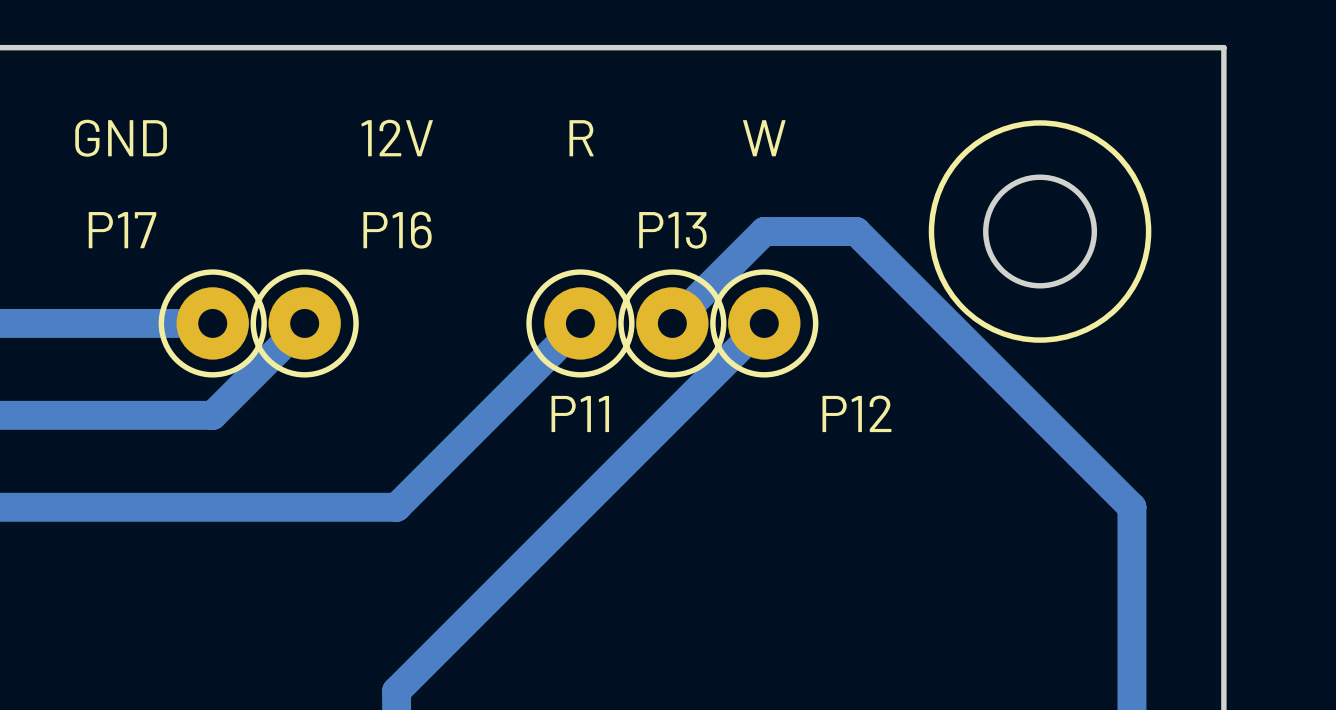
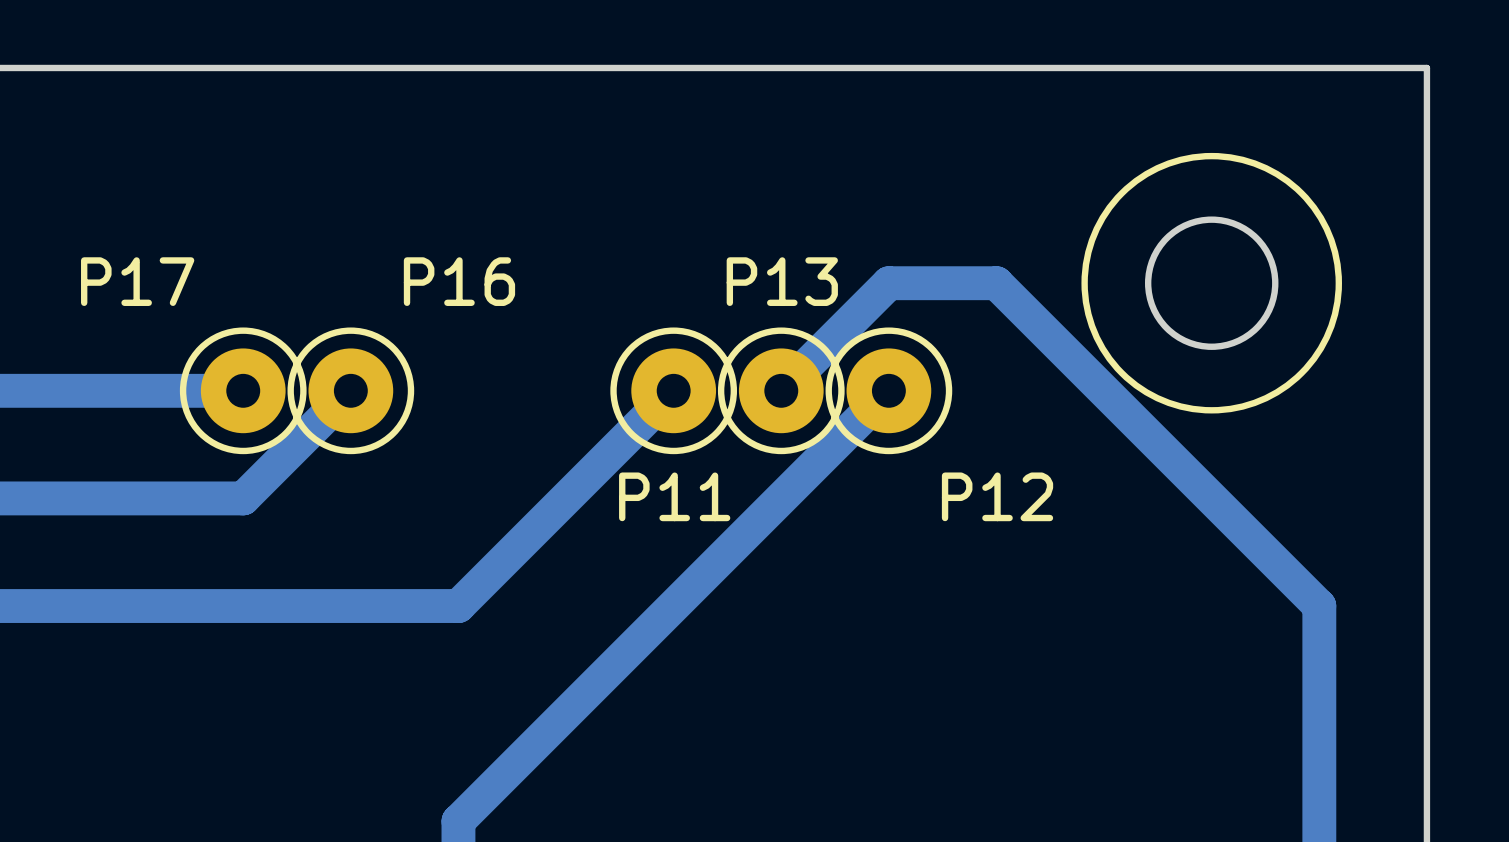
text: GND (121, 138) -> none
text: 12V (397, 138) -> none
text: R (581, 138) -> none
text: W (764, 138) -> none

